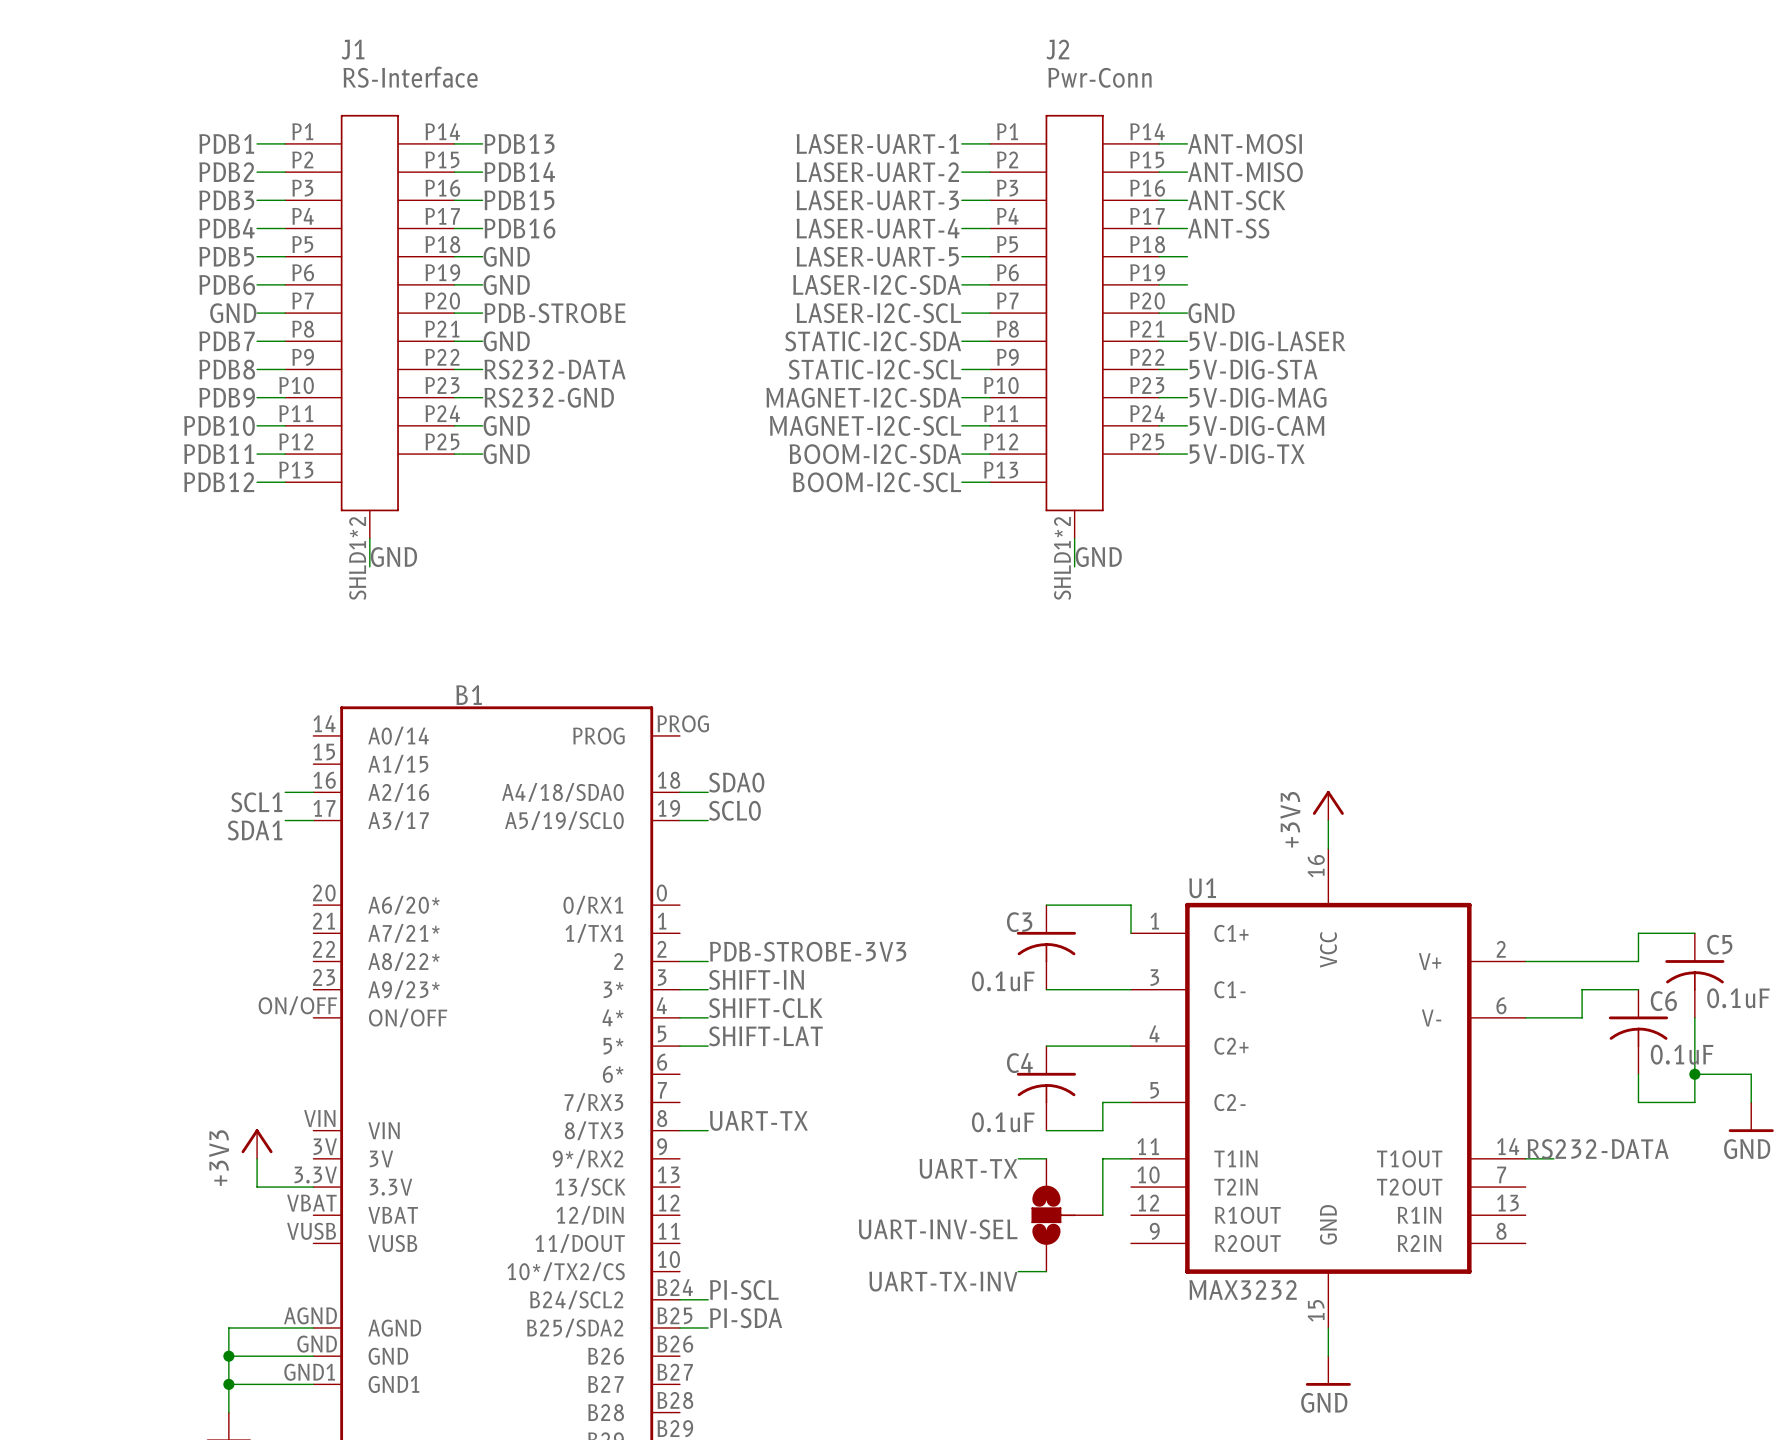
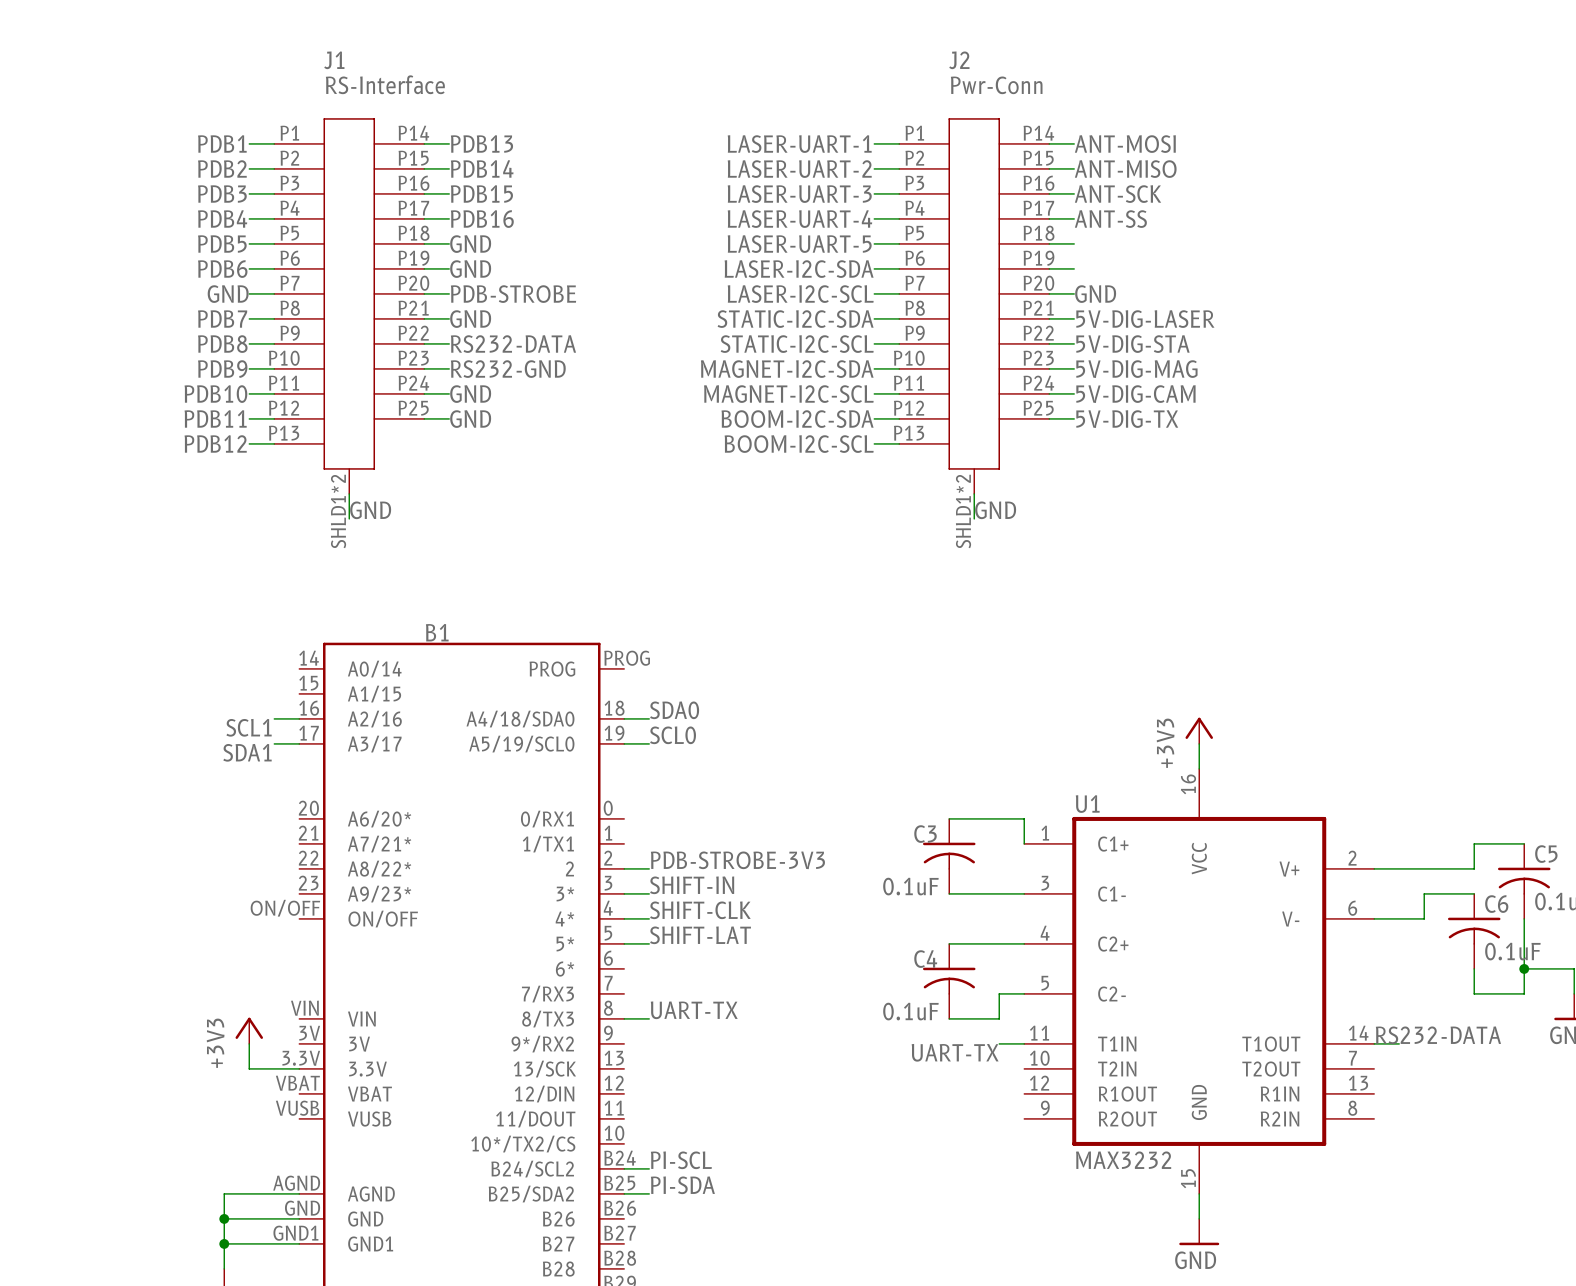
wire: (1018, 1158) (1046, 1158) -> none
wire: (1102, 1158) (1102, 1215) -> none
label position: UART-TX (968, 1168) -> UART-TX (955, 1052)
UART-INV-SEL: (1067, 1215) -> none
wire: (1018, 1271) (1046, 1271) -> none
label: UART-TX-INV (943, 1281) -> none

